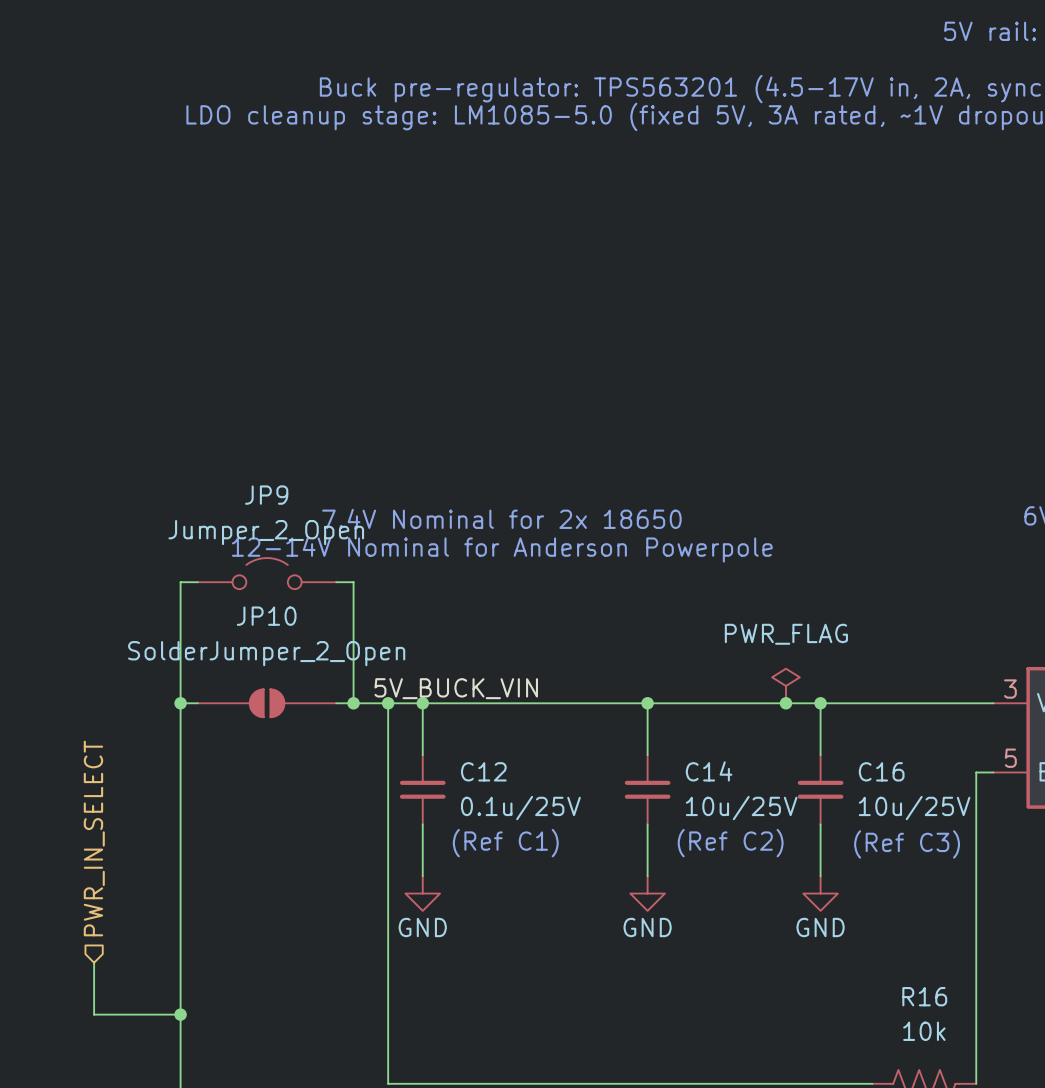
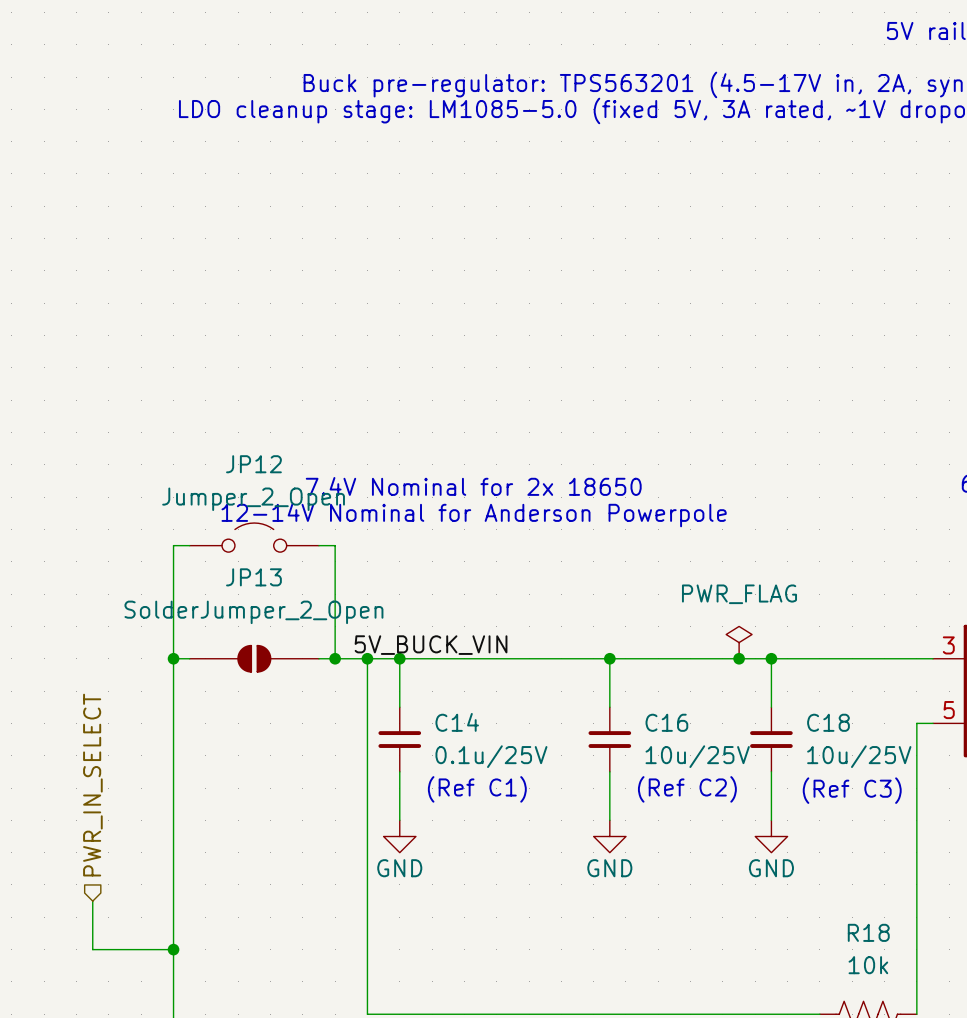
JP9 name: JP9 (266, 495) -> JP12 (253, 464)
JP10 name: JP10 (266, 616) -> JP13 (253, 577)
C12 name: C12 (483, 771) -> C14 (457, 722)
C14 name: C14 (709, 771) -> C16 (666, 722)
C16 name: C16 (881, 771) -> C18 (828, 722)
R16 name: R16 (924, 996) -> R18 (868, 932)

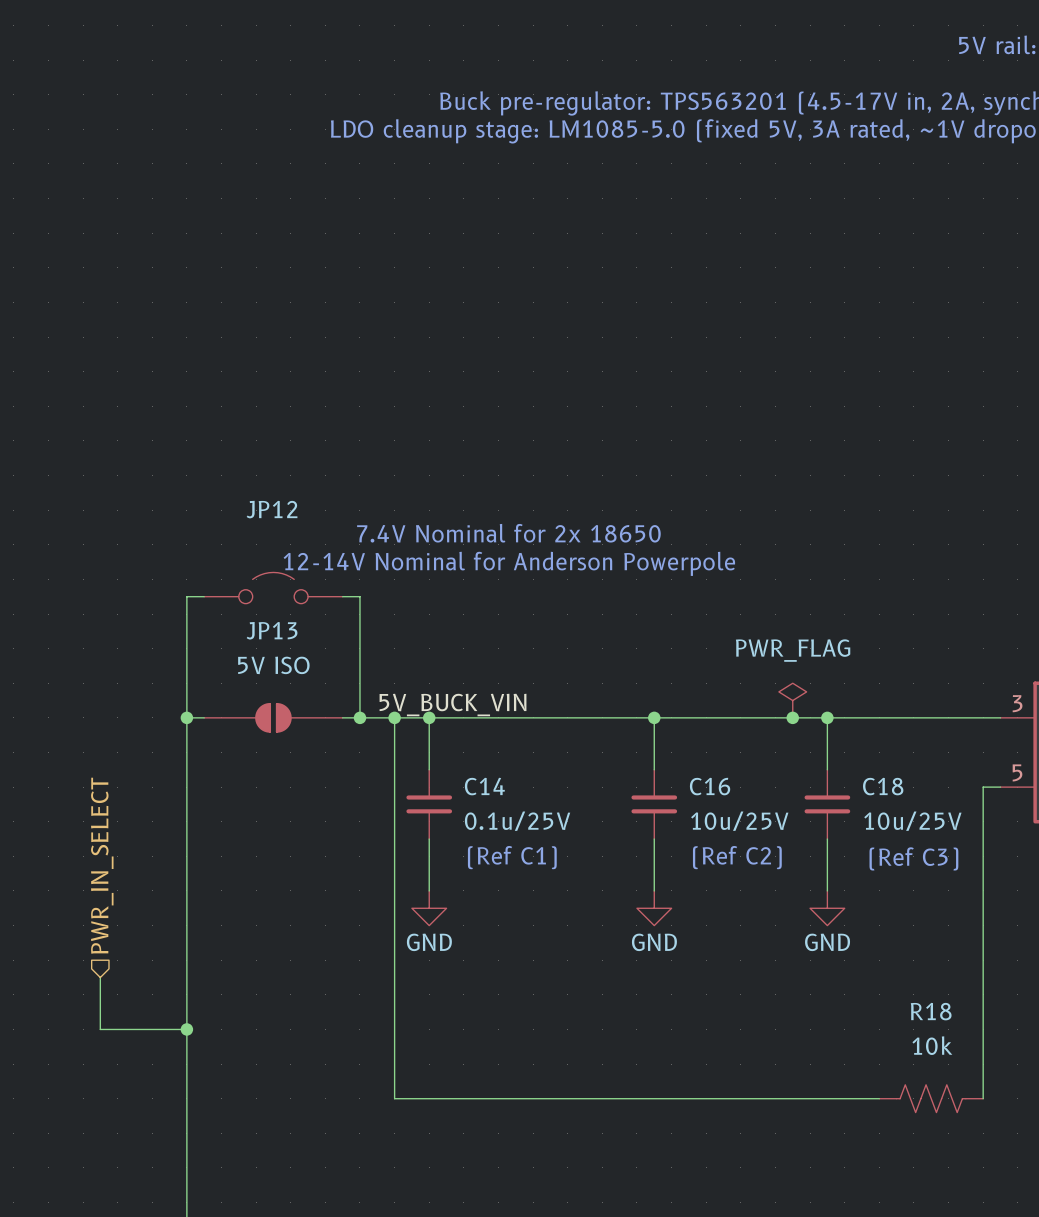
JP12 value: Jumper_2_Open (253, 499) -> none
JP13 value: SolderJumper_2_Open (253, 612) -> 5V ISO (273, 665)

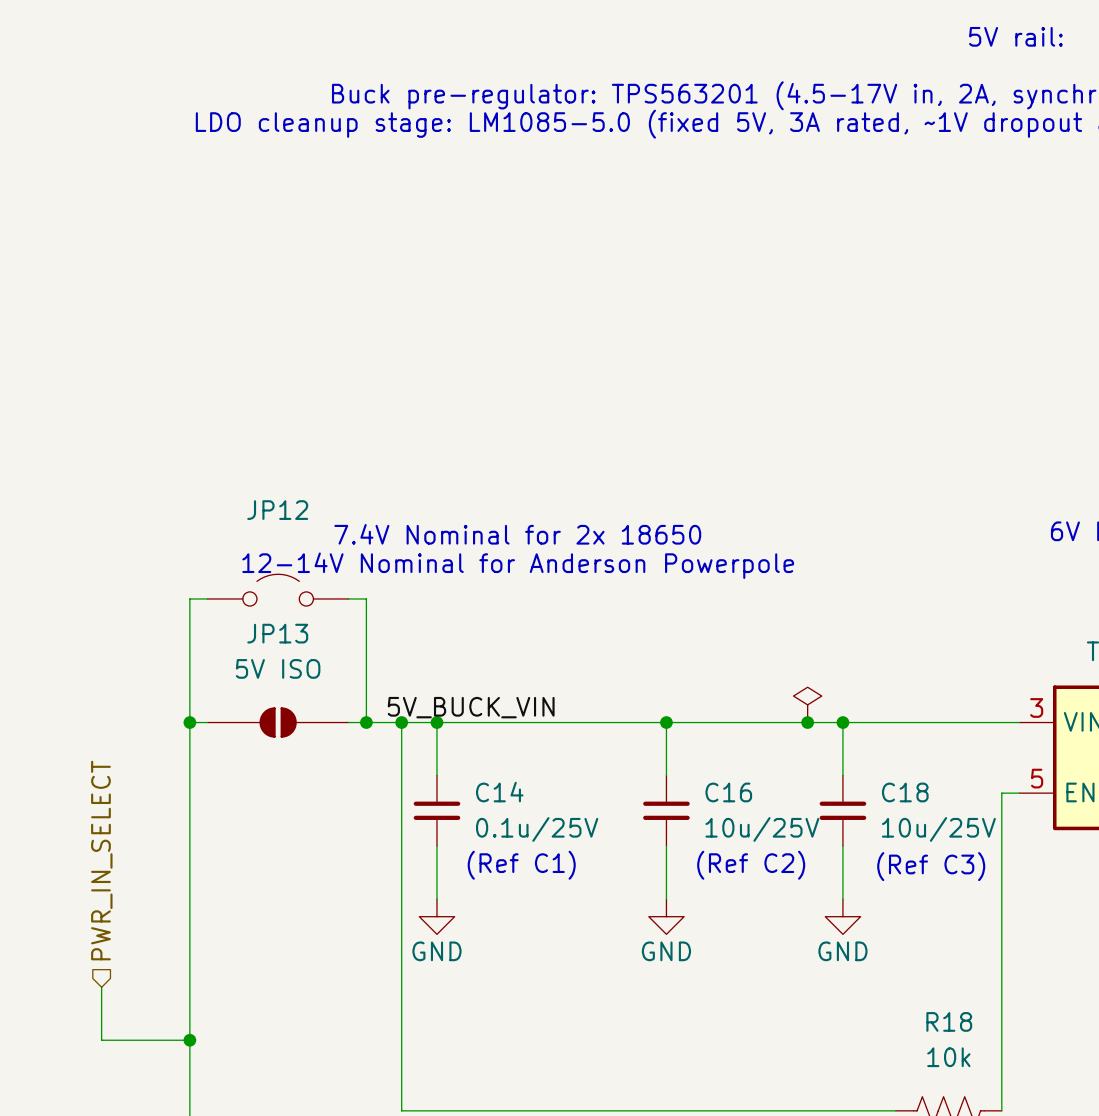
power symbol text: PWR_FLAG (793, 650) -> none

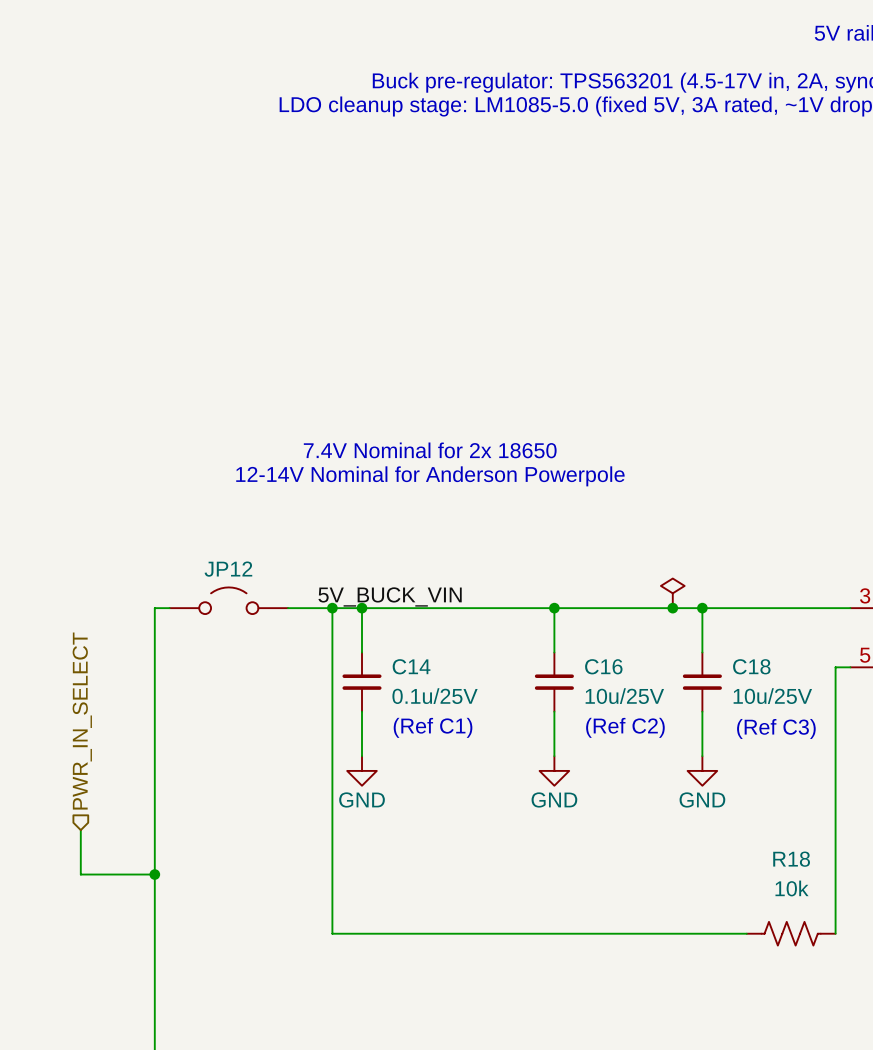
JP12 name position: JP12 (277, 510) -> JP12 (228, 569)
JP12 position: (278, 590) -> (228, 600)
wire: (207, 598) (189, 598) (189, 722) -> none
wire: (348, 598) (366, 598) (366, 722) -> none
junction: (189, 722) -> none
JP13: 5V ISO (278, 722) -> none
junction: (366, 722) -> none

